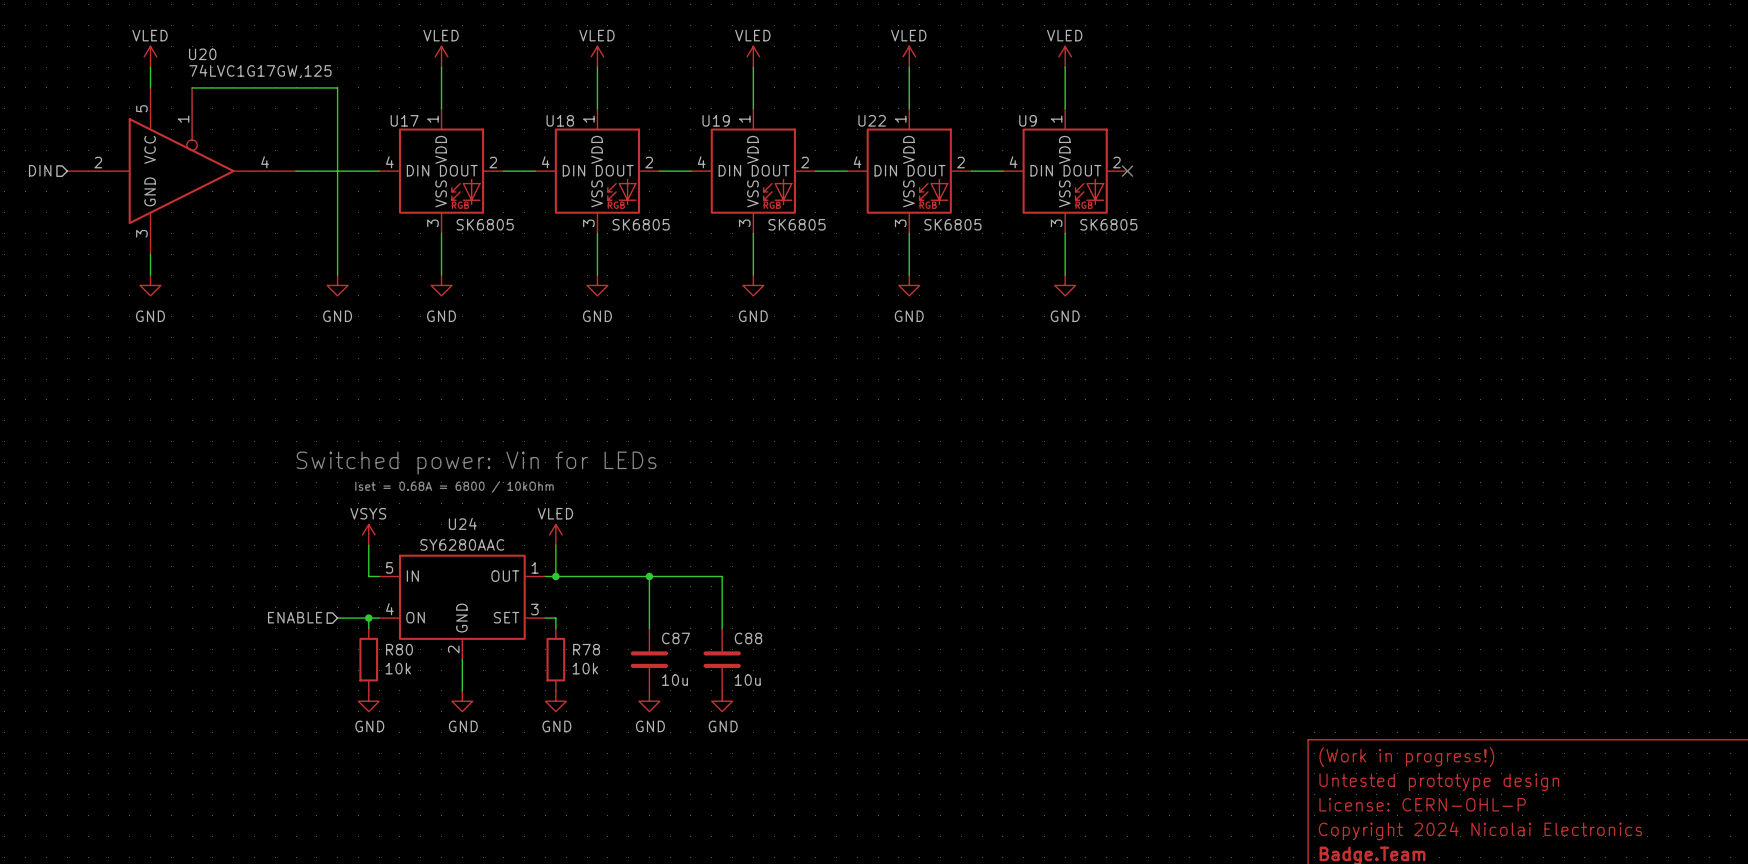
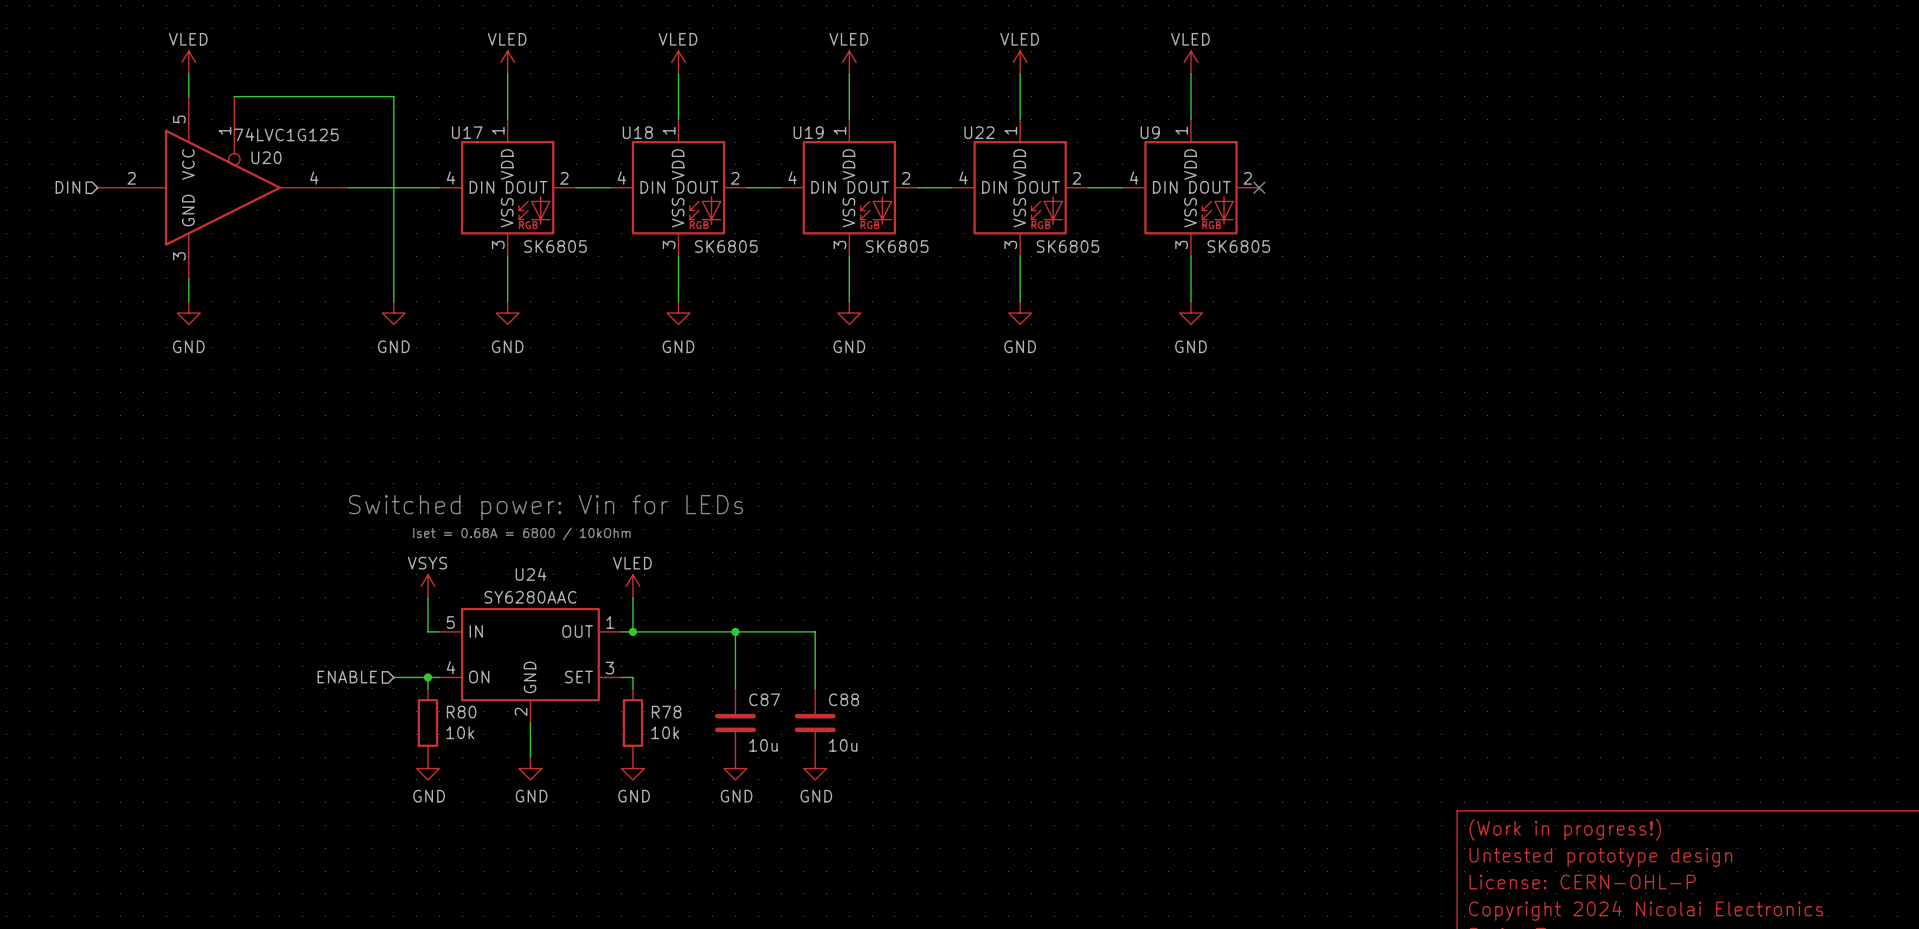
U20 name position: U20 (202, 54) -> U20 (266, 157)
U20 value: 74LVC1G17GW,125 (260, 71) -> 74LVC1G125 (286, 134)

